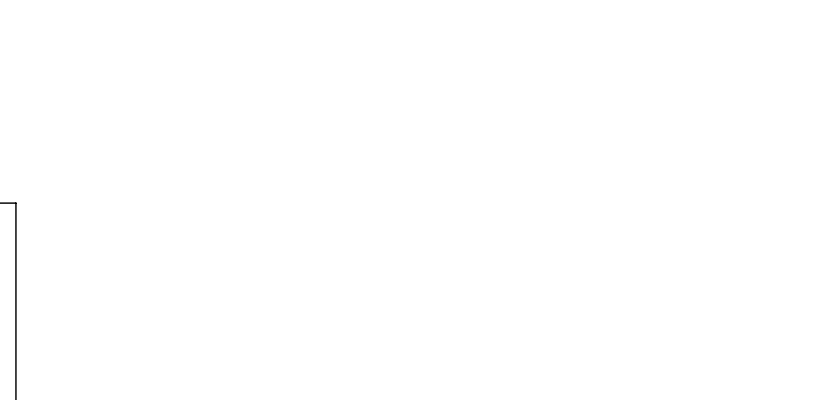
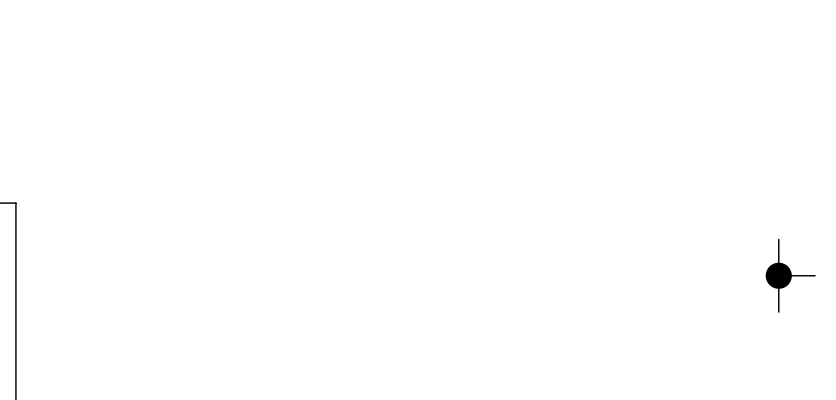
wire: none -> (778, 239) (778, 312)
wire: none -> (778, 275) (815, 275)
junction: none -> (778, 275)

